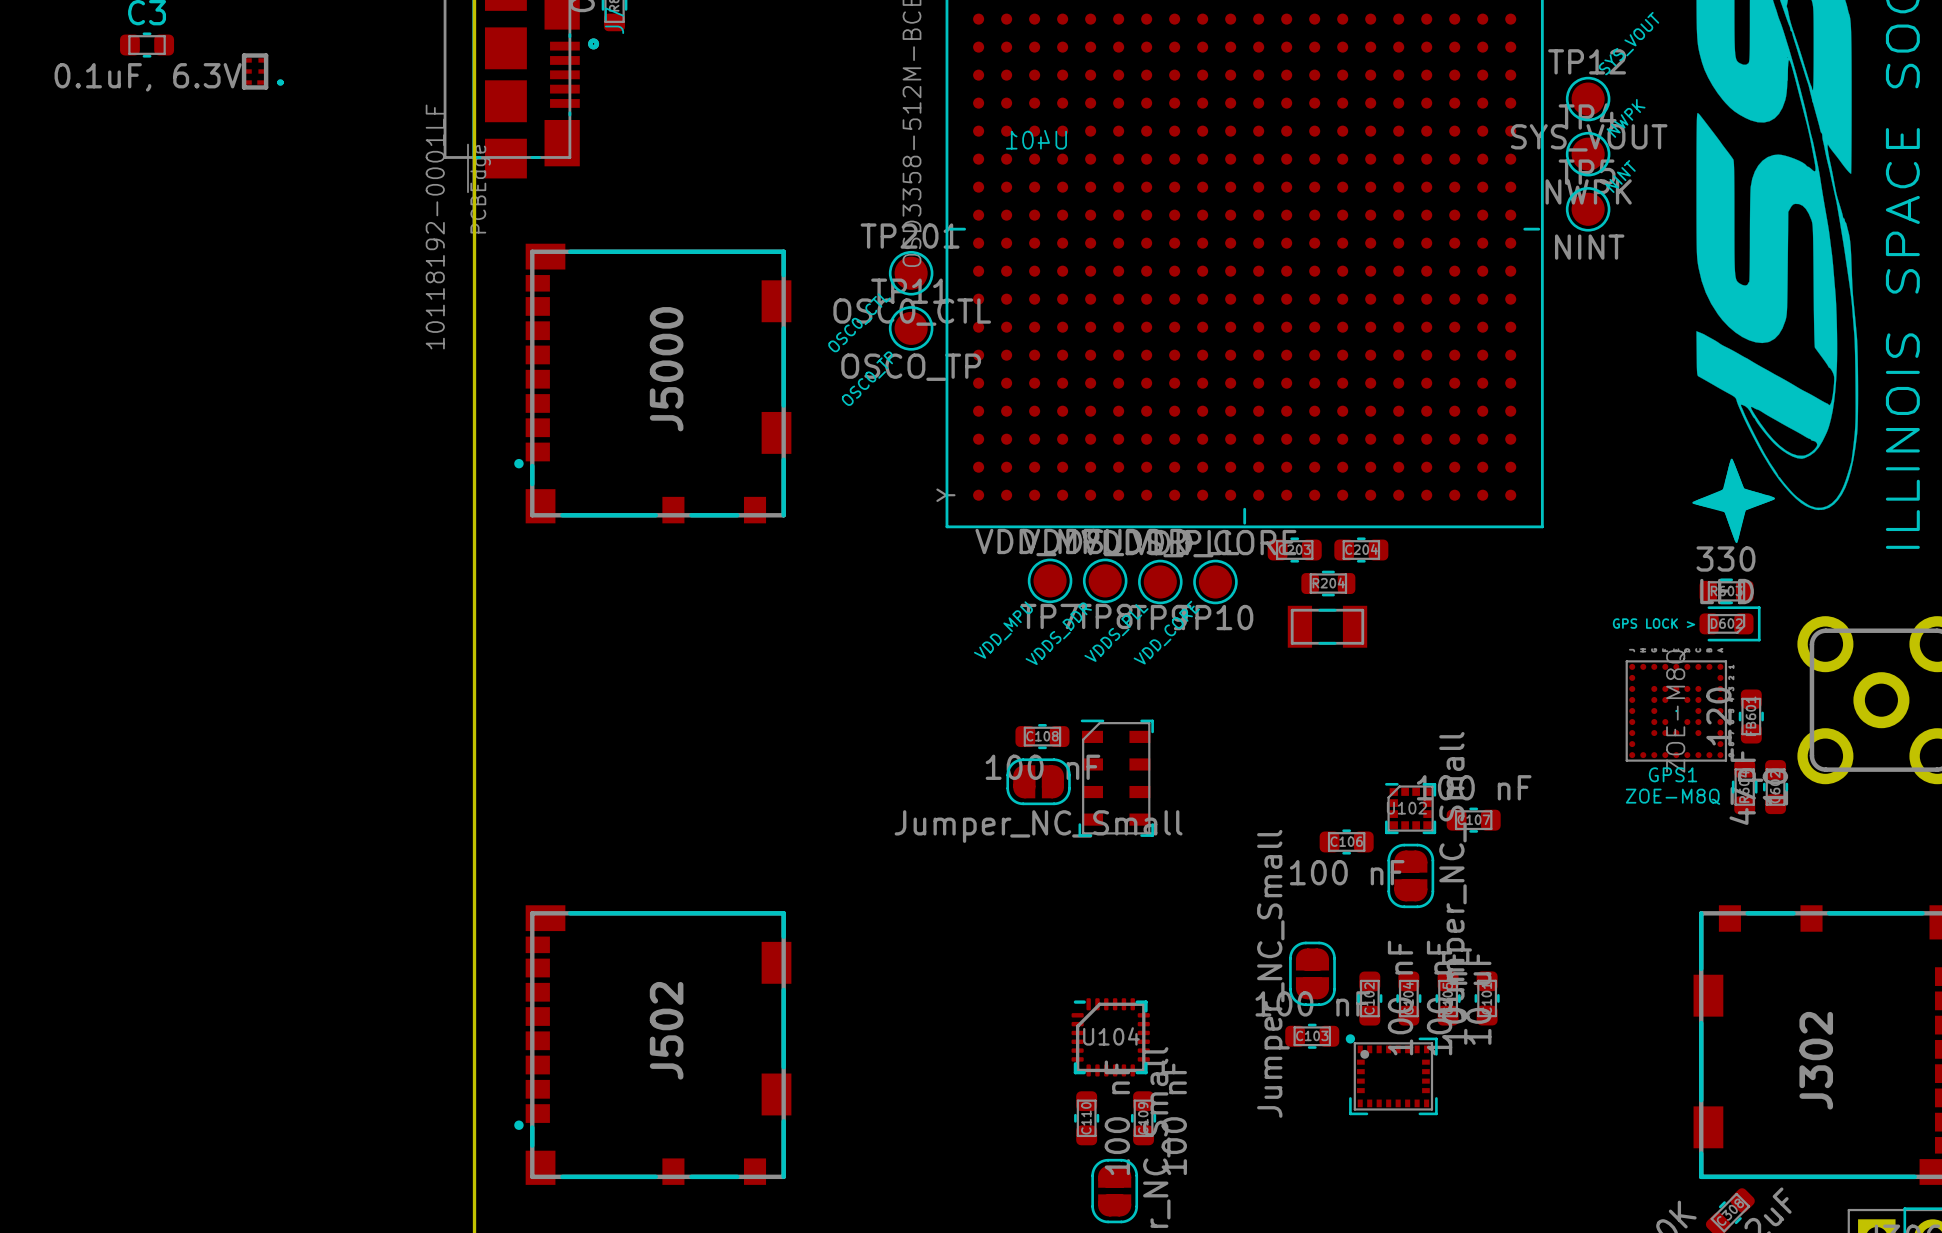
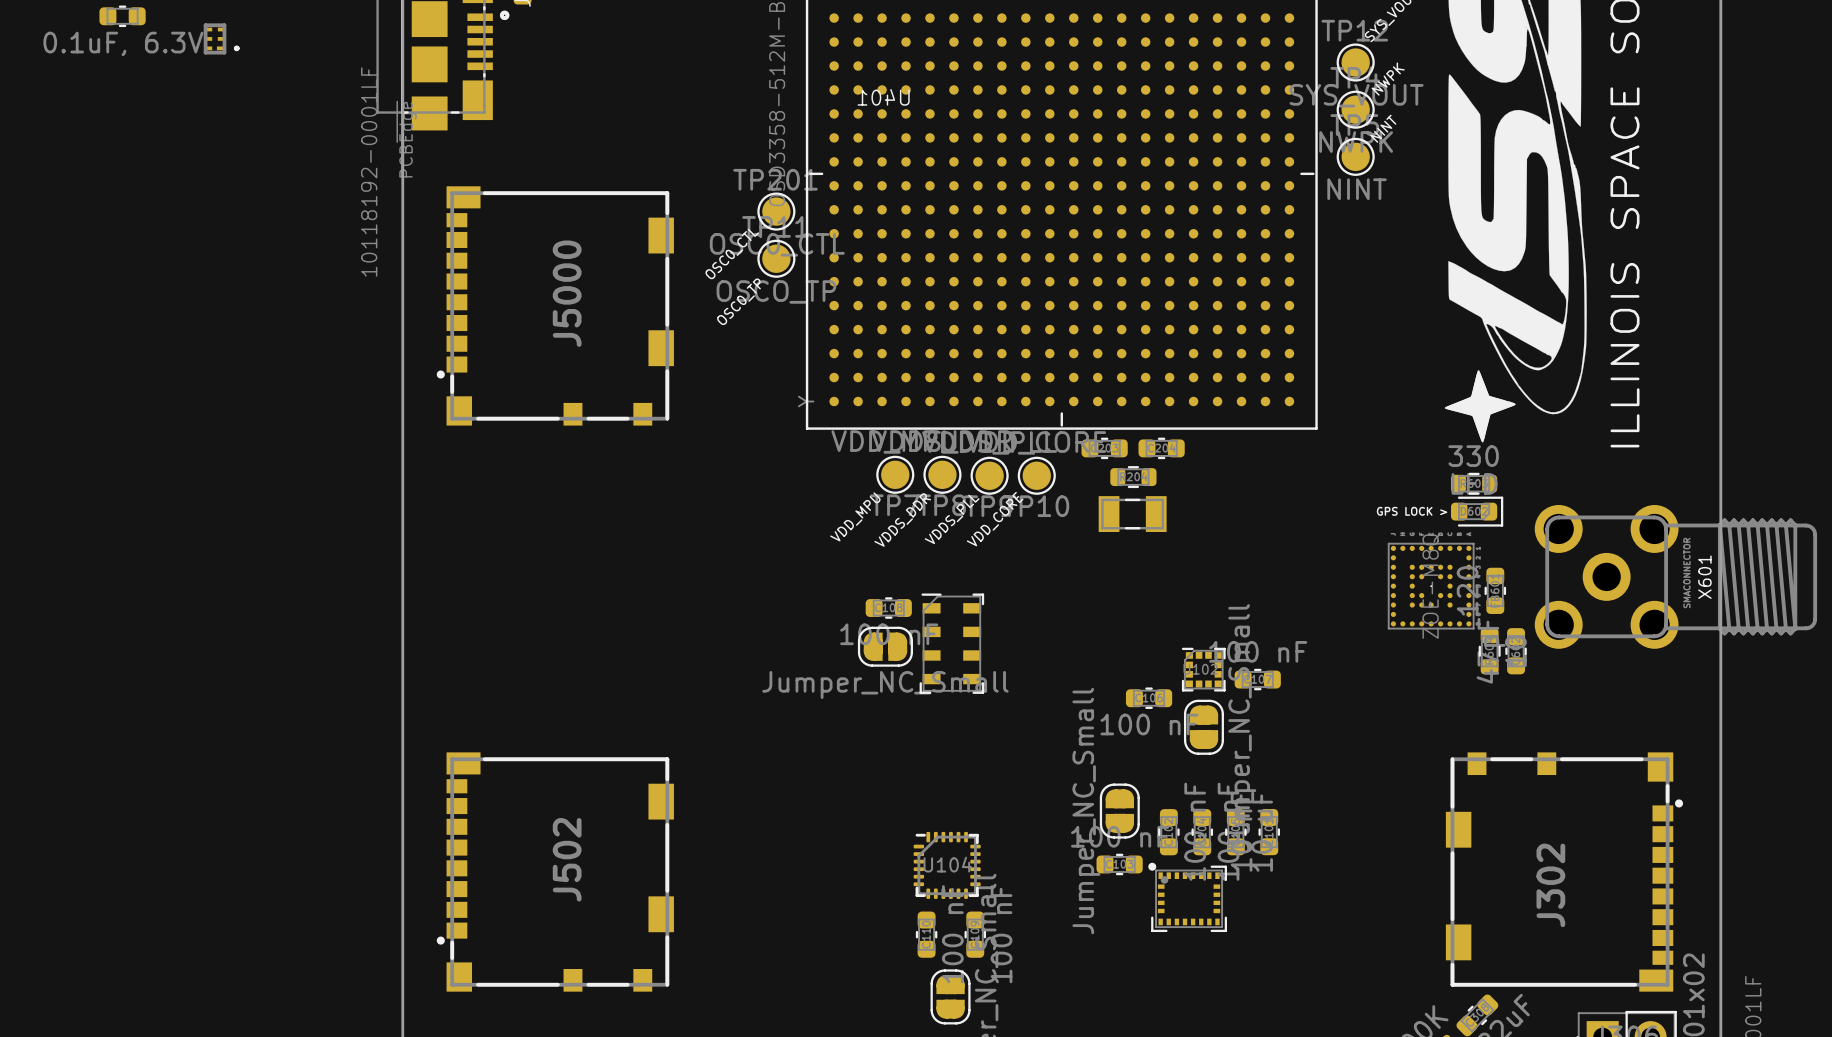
text: GPS1 (1673, 774) -> none
text: ZOE-M8Q (1673, 796) -> none

